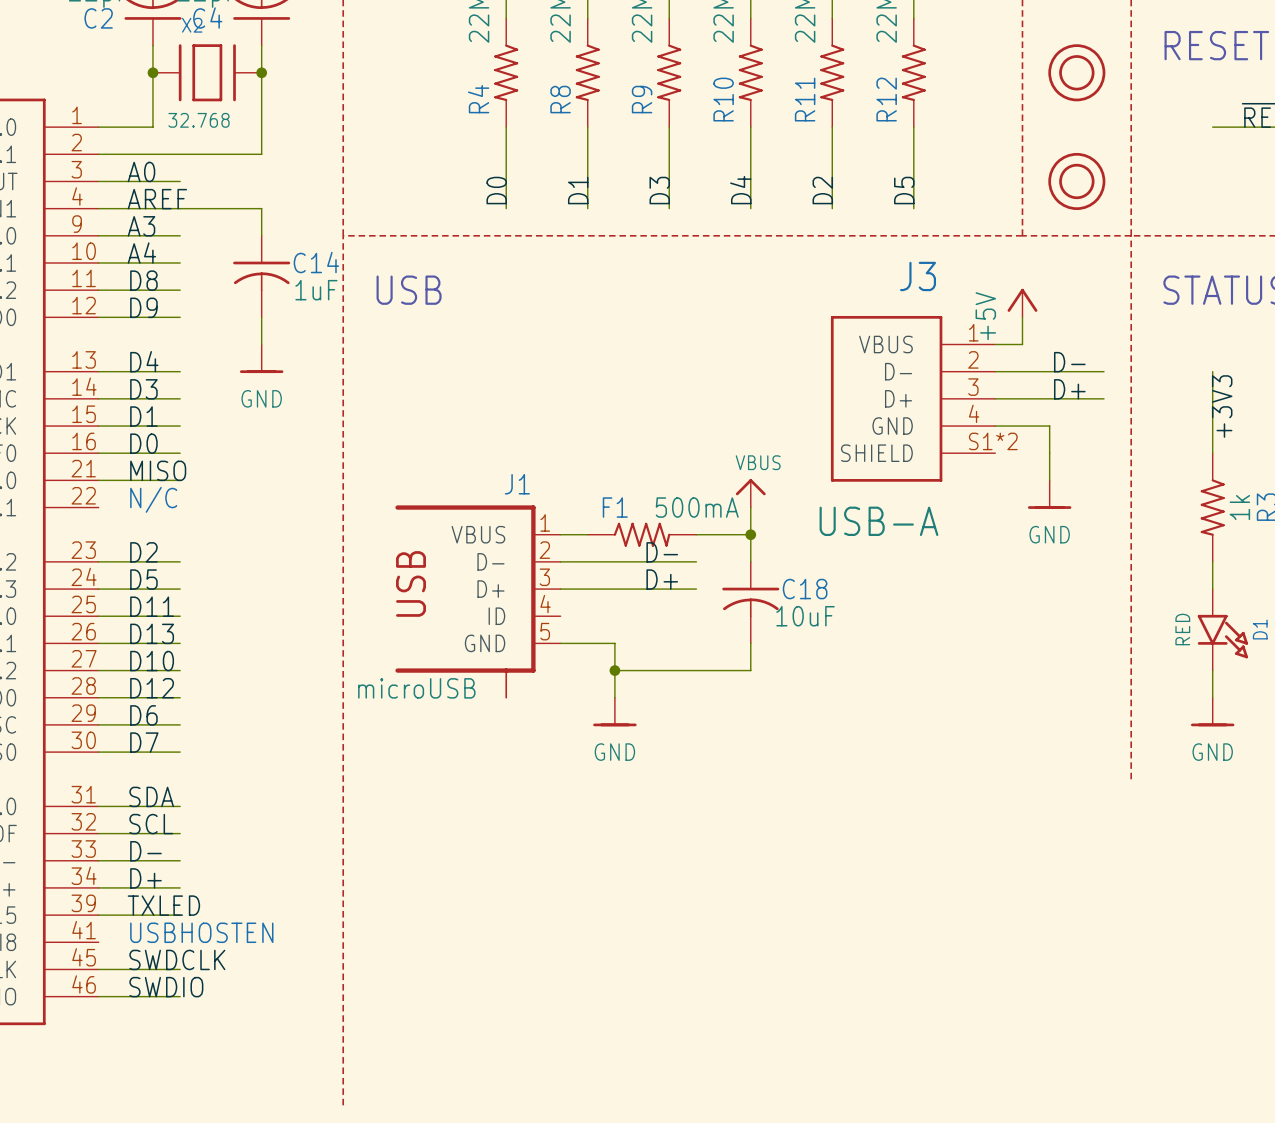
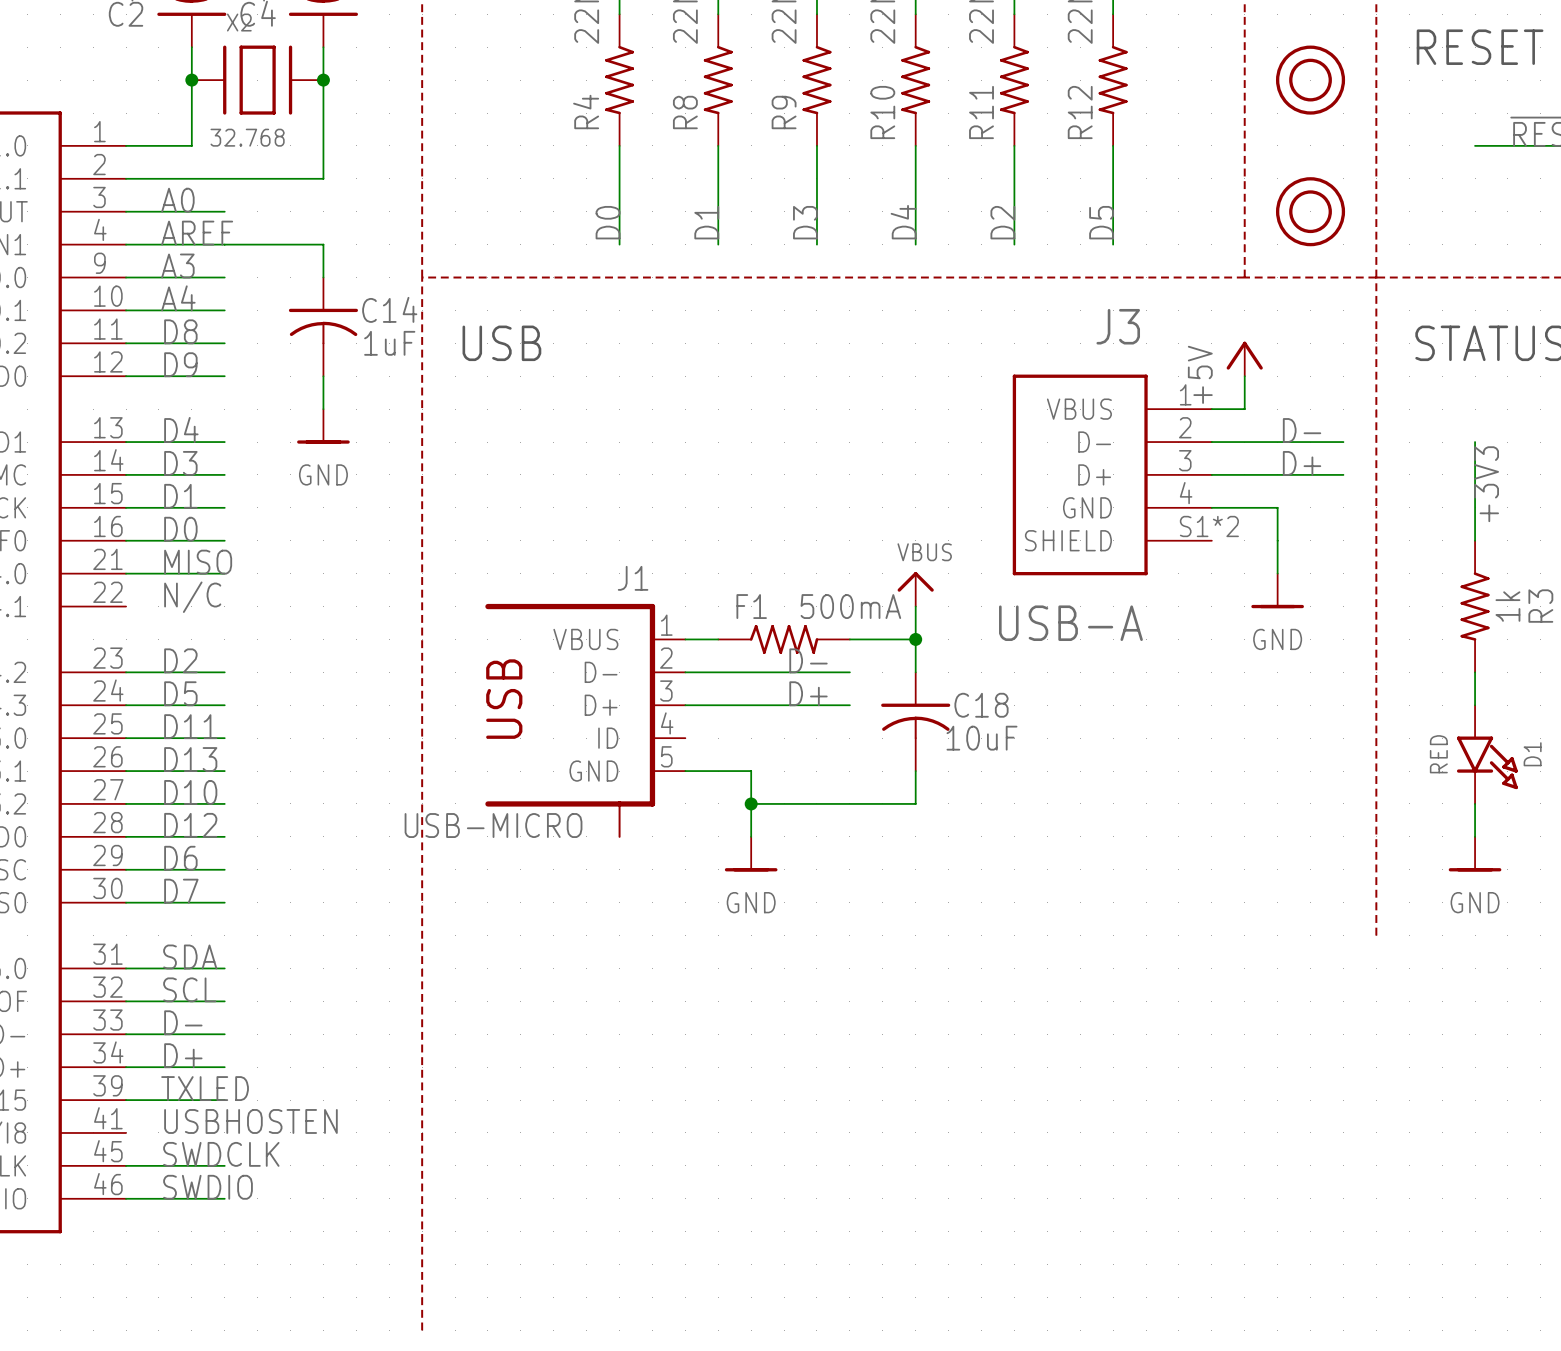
J1 value: microUSB (416, 688) -> USB-MICRO (493, 825)

